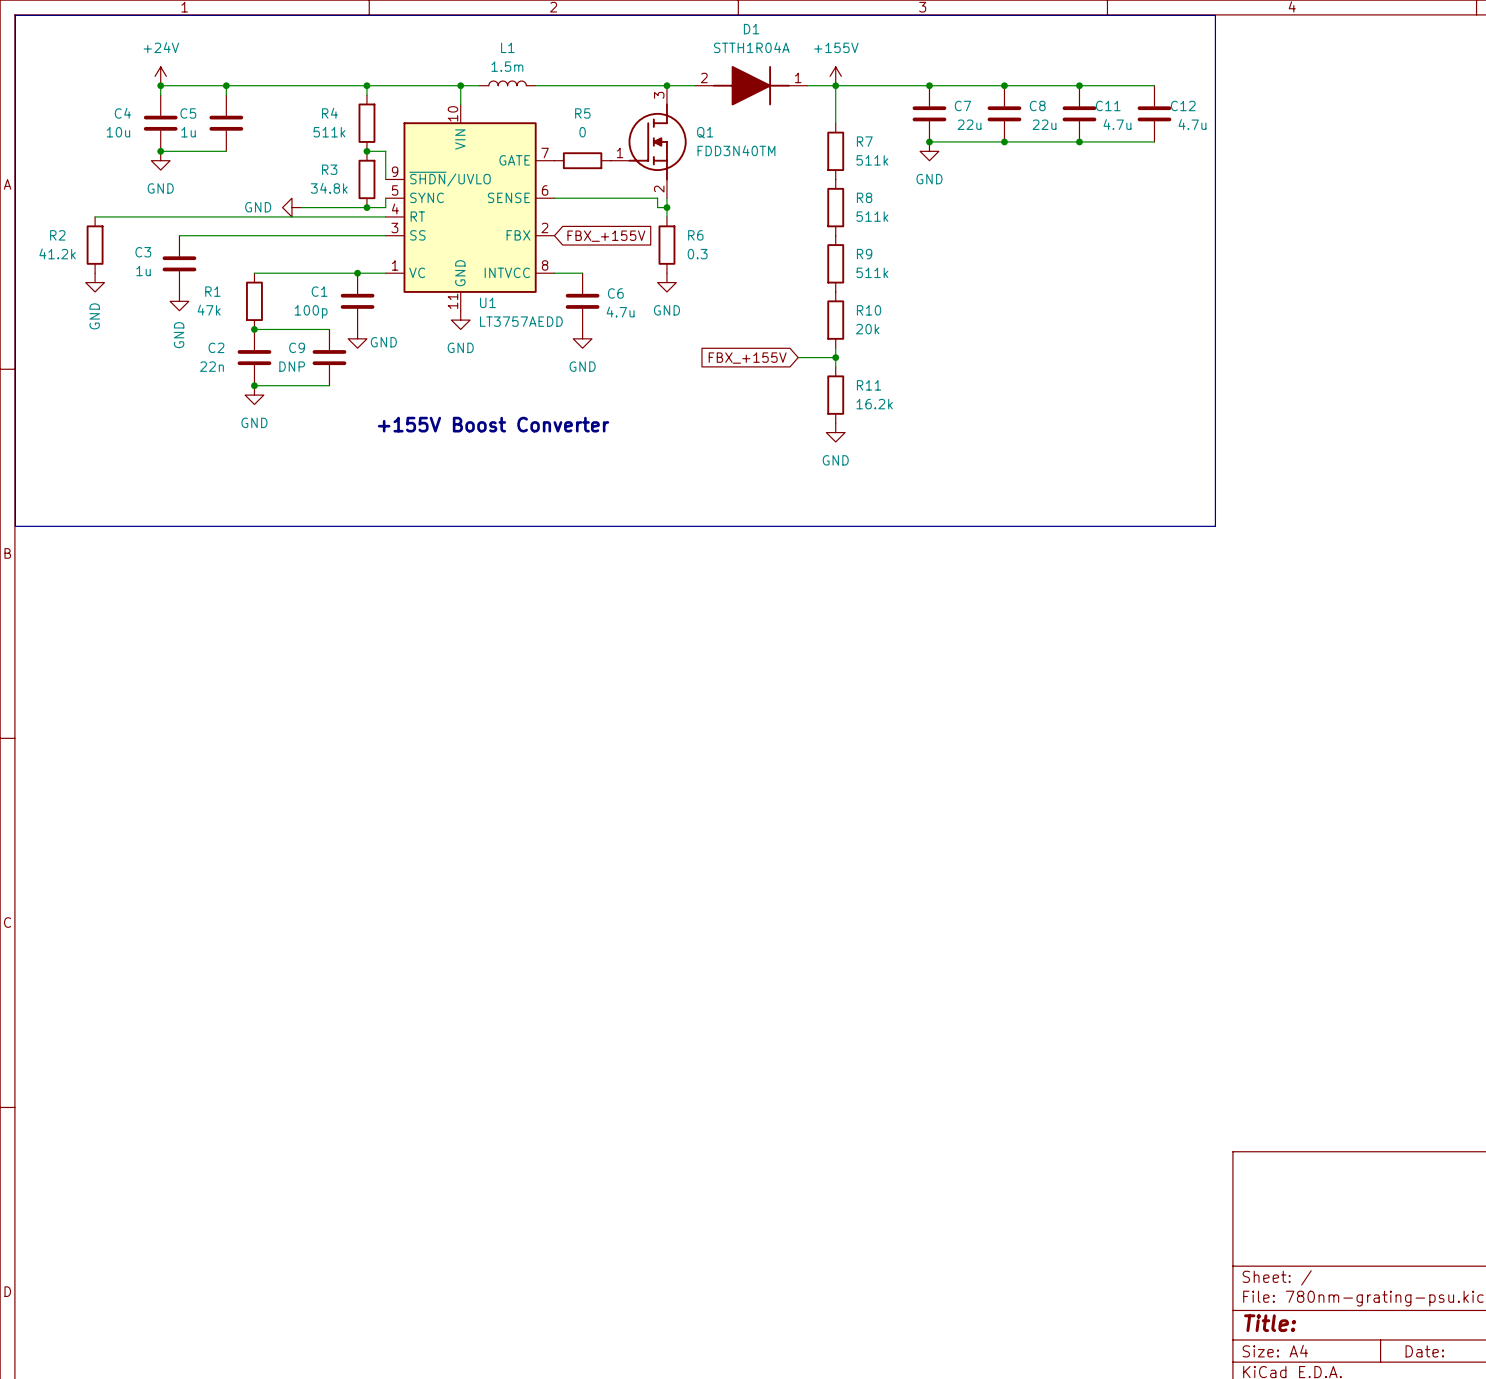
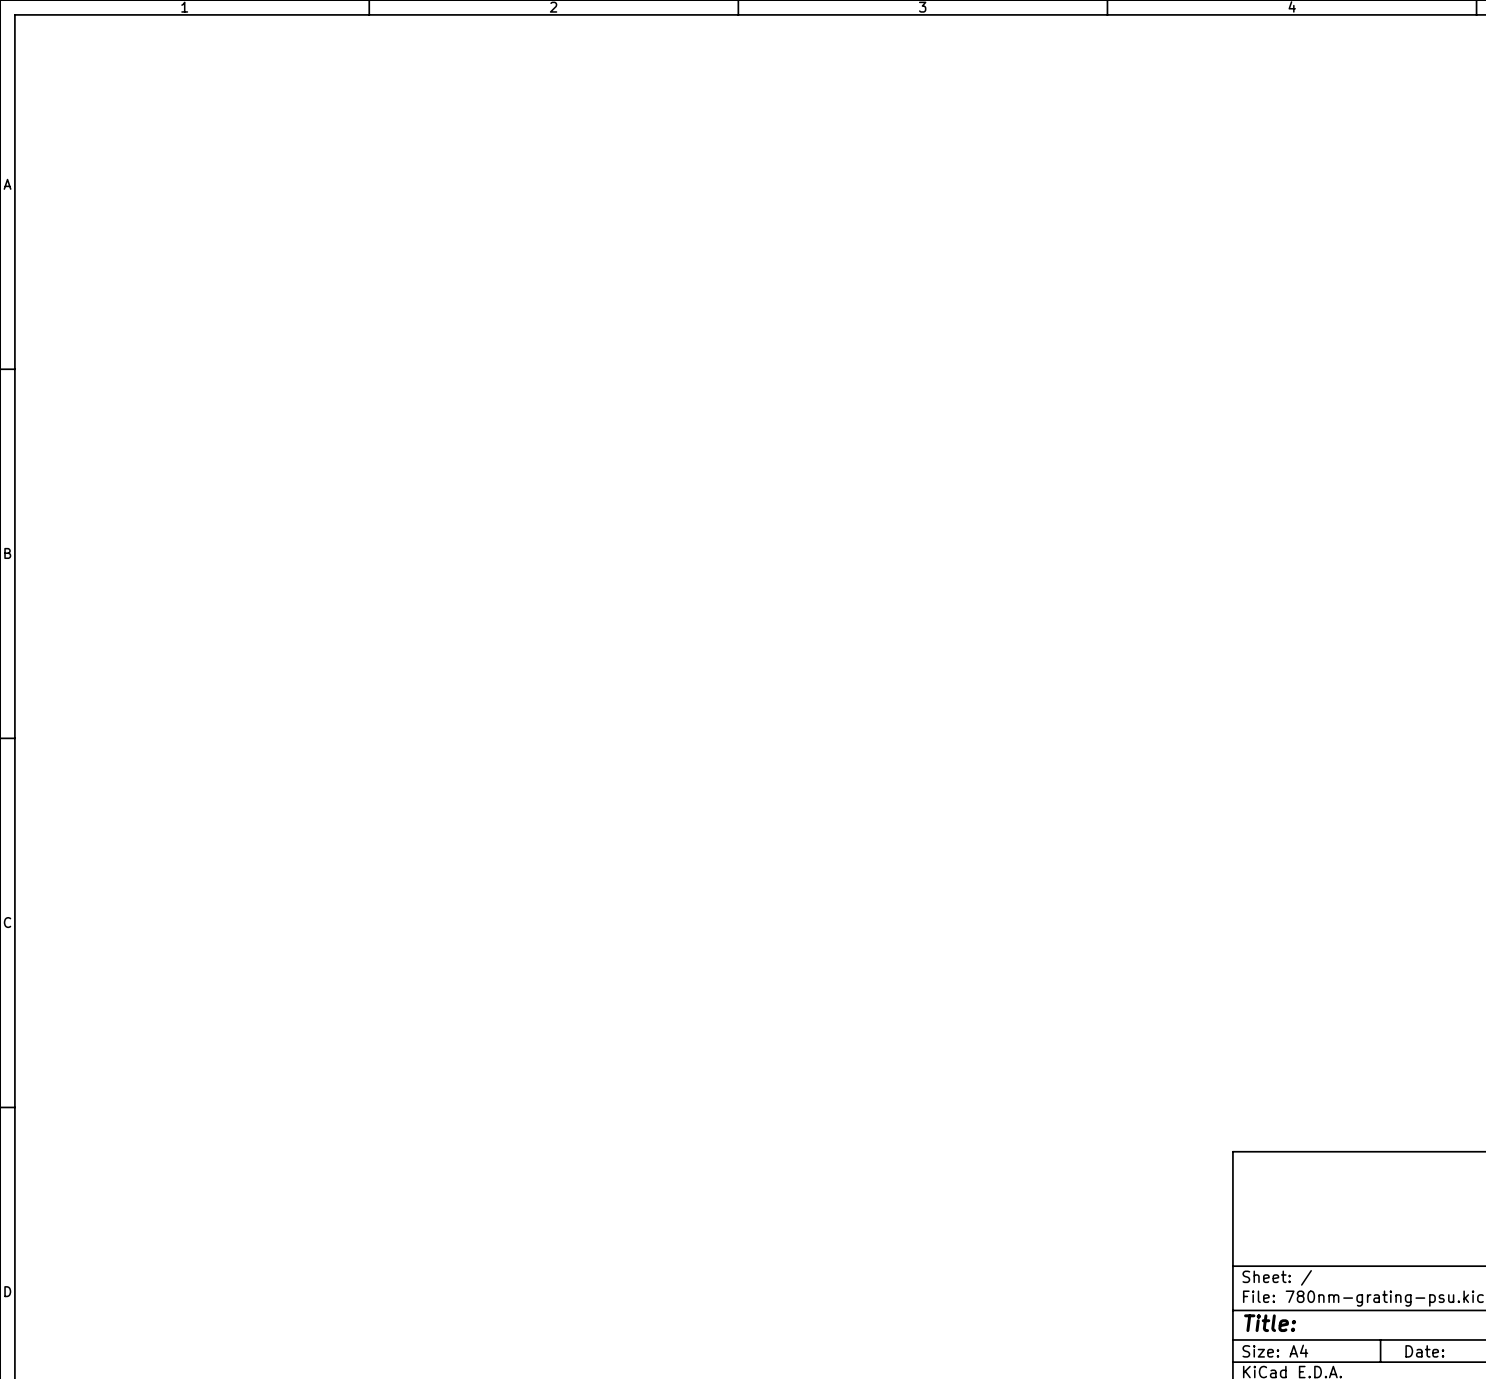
line: (15, 15) (1215, 15) (1215, 526) (15, 526) (15, 15) -> none
power symbol: +24V (160, 76) -> none
power symbol: +155V (835, 76) -> none
L1: 1.5m (507, 83) -> none
junction: (160, 85) -> none
wire: (226, 85) (226, 95) -> none
junction: (226, 85) -> none
wire: (366, 85) (366, 95) -> none
junction: (366, 85) -> none
wire: (460, 85) (460, 104) -> none
junction: (460, 85) -> none
wire: (479, 85) (160, 85) (160, 95) -> none
wire: (535, 85) (695, 85) -> none
junction: (666, 85) -> none
D1: STTH1R04A (751, 85) -> none
wire: (807, 85) (1154, 85) -> none
wire: (835, 85) (835, 123) -> none
junction: (835, 85) -> none
junction: (929, 85) -> none
junction: (1004, 85) -> none
junction: (1079, 85) -> none
C7: 22u (929, 113) -> none
C8: 22u (1004, 113) -> none
C11: 4.7u (1079, 113) -> none
C12: 4.7u (1154, 113) -> none
C4: 10u (160, 123) -> none
C5: 1u (226, 123) -> none
R4: 511k (366, 123) -> none
Q1: FDD3N40TM (648, 141) -> none
wire: (929, 141) (1154, 141) -> none
junction: (929, 141) -> none
junction: (1004, 141) -> none
junction: (1079, 141) -> none
wire: (160, 151) (226, 151) -> none
junction: (160, 151) -> none
wire: (366, 151) (385, 151) (385, 179) -> none
junction: (366, 151) -> none
R7: 511k (835, 151) -> none
power symbol: GND (929, 151) -> none
power symbol: GND (160, 160) -> none
R5: 0 (582, 160) -> none
R3: 34.8k (366, 179) -> none
wire: (385, 198) (385, 207) (301, 207) -> none
wire: (554, 198) (657, 198) (657, 207) (666, 207) -> none
wire: (666, 198) (666, 216) -> none
power symbol: GND (291, 207) -> none
junction: (366, 207) -> none
U1: LT3757AEDD (470, 207) -> none
junction: (666, 207) -> none
R8: 511k (835, 207) -> none
wire: (95, 216) (385, 216) -> none
wire: (179, 235) (385, 235) -> none
global label: FBX_+155V (606, 236) -> none
R2: 41.2k (95, 245) -> none
R6: 0.3 (666, 245) -> none
C3: 1u (179, 263) -> none
R9: 511k (835, 263) -> none
wire: (254, 273) (385, 273) -> none
junction: (357, 273) -> none
wire: (554, 273) (582, 273) -> none
power symbol: GND (95, 282) -> none
power symbol: GND (666, 282) -> none
power symbol: GND (179, 301) -> none
R1: 47k (254, 301) -> none
C1: 100p (357, 301) -> none
C6: 4.7u (582, 301) -> none
power symbol: GND (460, 320) -> none
R10: 20k (835, 320) -> none
wire: (254, 329) (329, 329) -> none
junction: (254, 329) -> none
power symbol: GND (357, 338) -> none
power symbol: GND (582, 338) -> none
wire: (835, 348) (835, 366) -> none
C2: 22n (254, 357) -> none
C9: DNP (329, 357) -> none
wire: (798, 357) (835, 357) -> none
junction: (835, 357) -> none
global label: FBX_+155V (747, 358) -> none
wire: (254, 385) (329, 385) -> none
junction: (254, 385) -> none
power symbol: GND (254, 395) -> none
R11: 16.2k (835, 395) -> none
text: +155V Boost Converter (493, 424) -> none
power symbol: GND (835, 432) -> none

